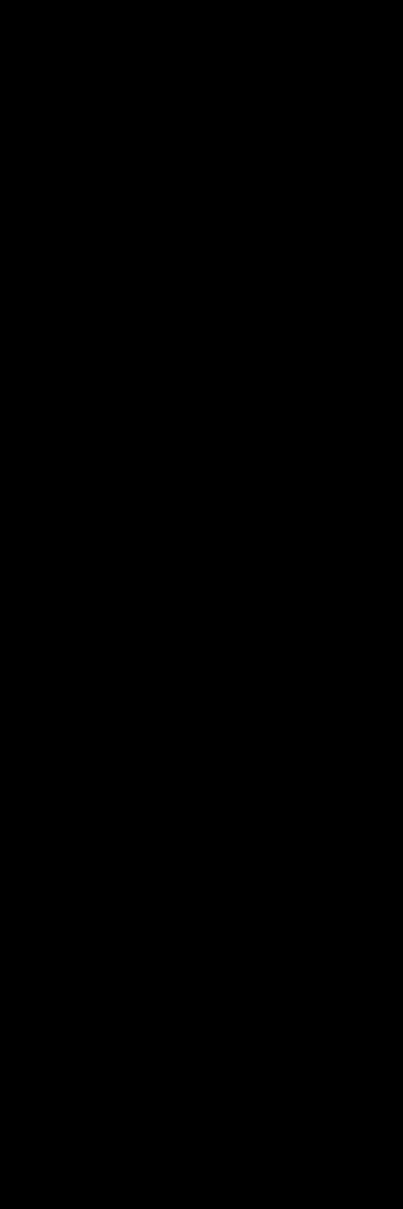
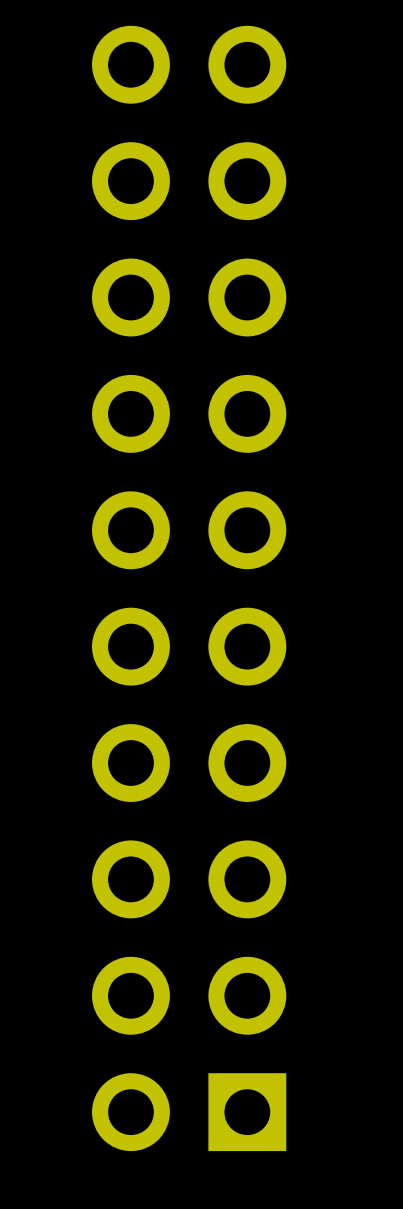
part: none -> (189, 588)

